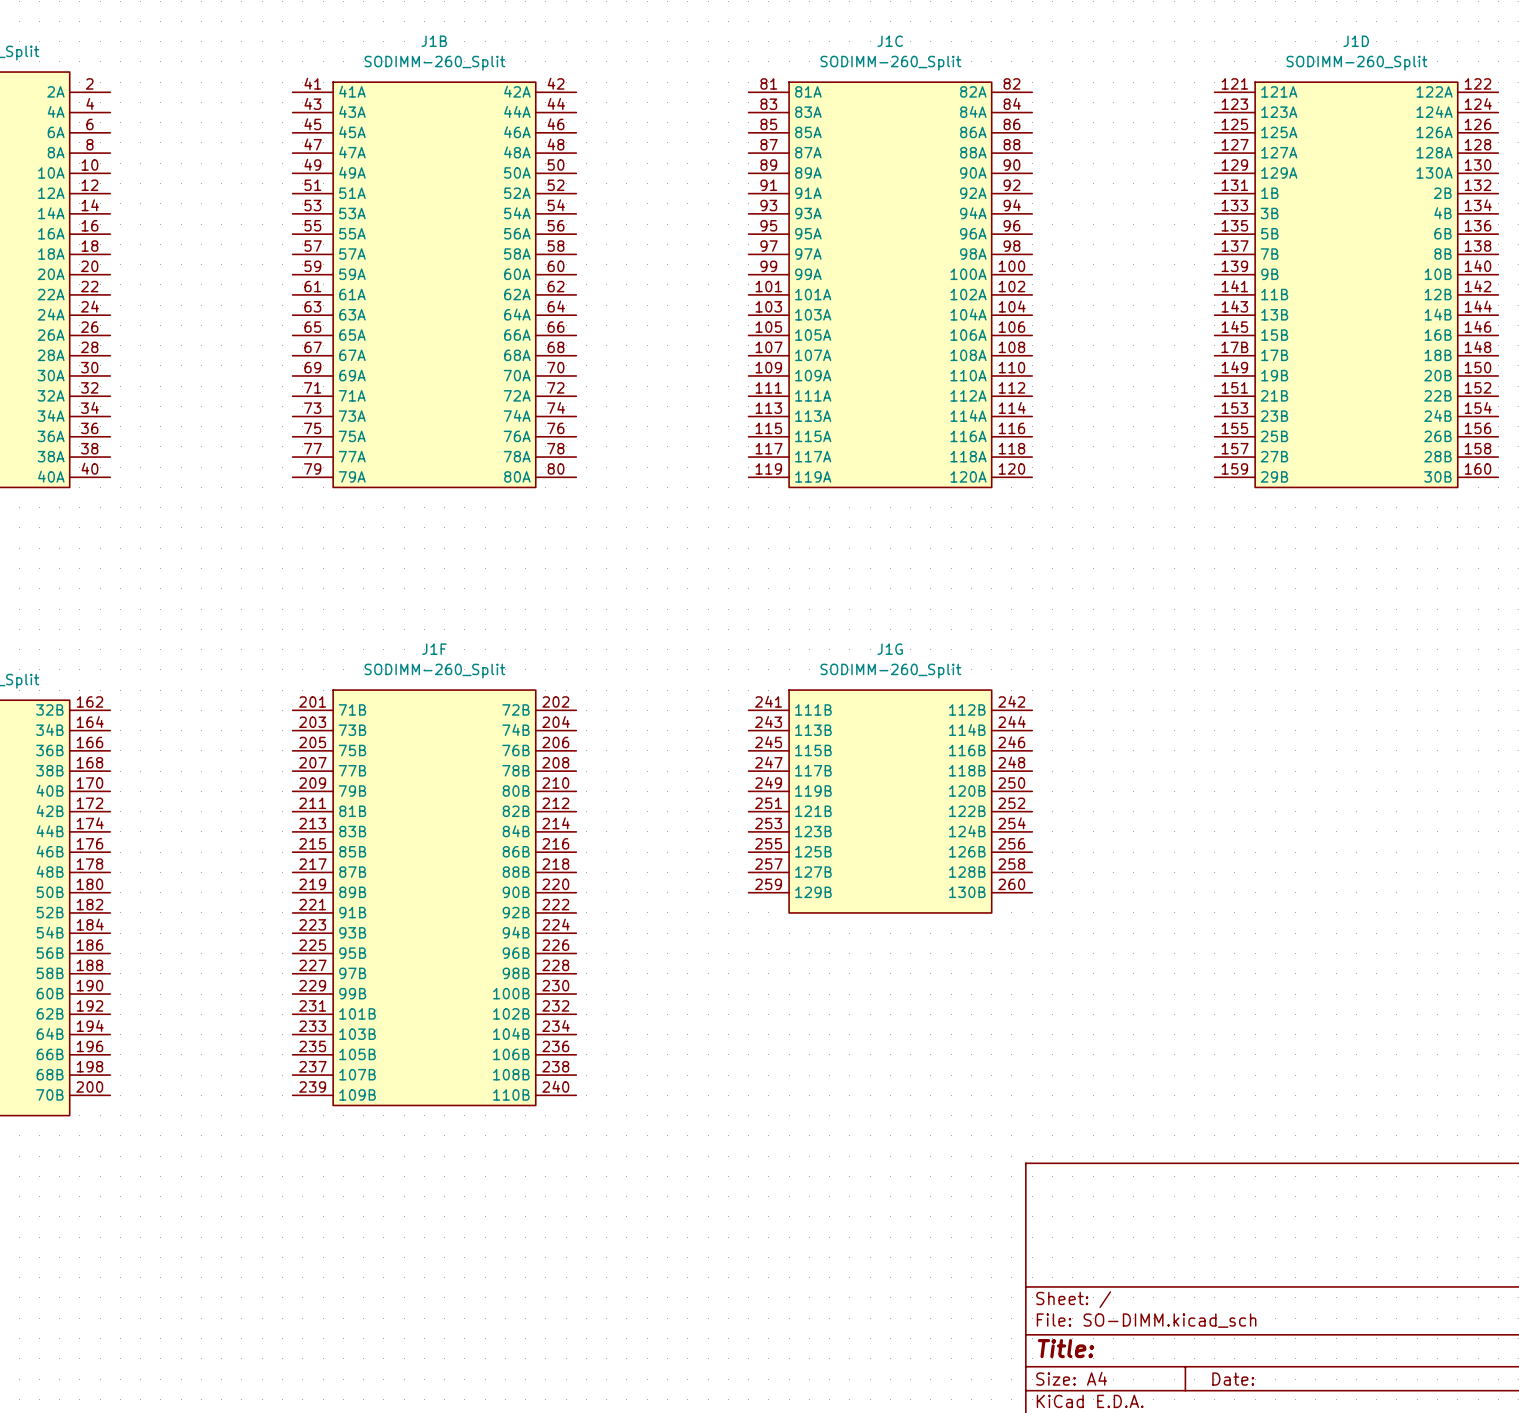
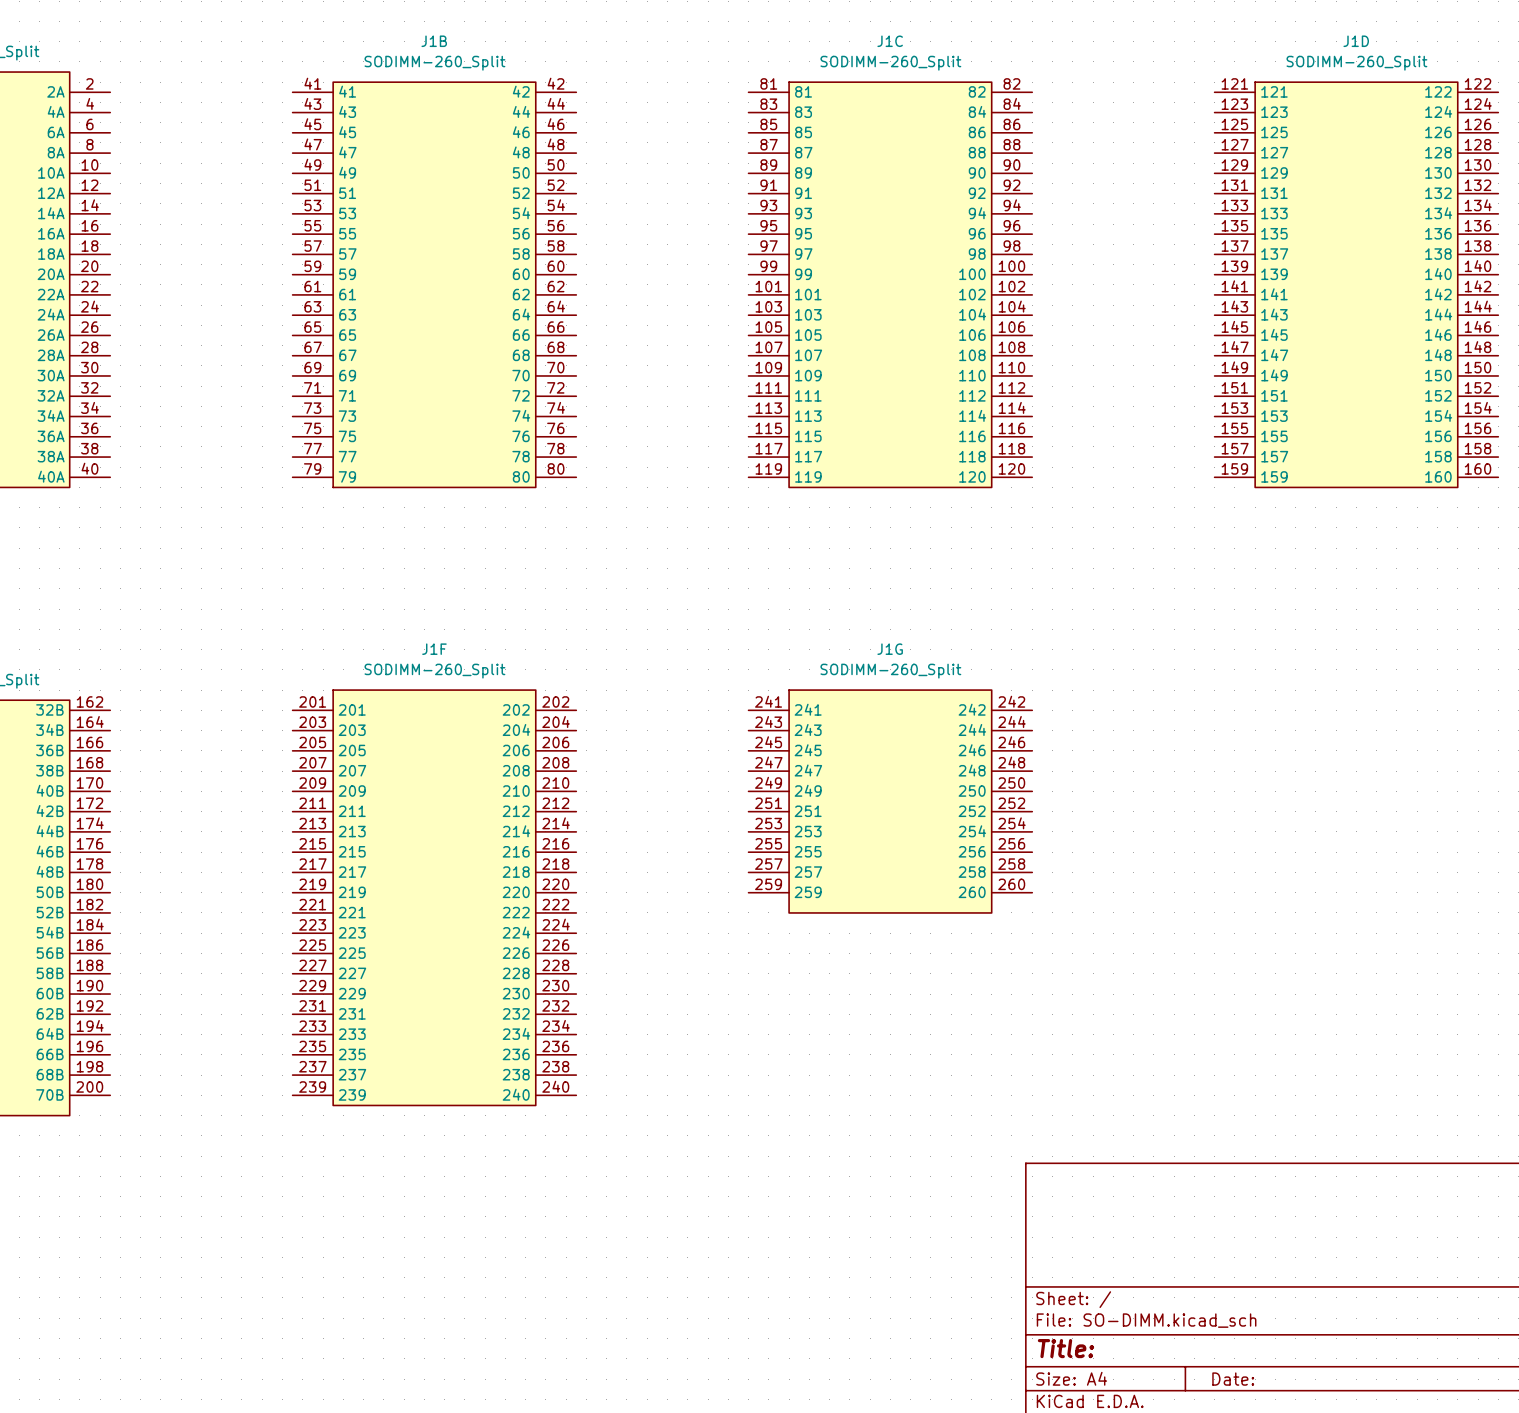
J1B symbol: [292, 82, 577, 488] -> [292, 82, 577, 488]
J1C symbol: [748, 82, 1033, 488] -> [748, 82, 1033, 488]
J1D symbol: [1214, 82, 1499, 488] -> [1214, 82, 1499, 488]
J1F symbol: [292, 690, 577, 1106] -> [292, 690, 577, 1106]
J1G symbol: [748, 690, 1033, 913] -> [748, 690, 1033, 913]

